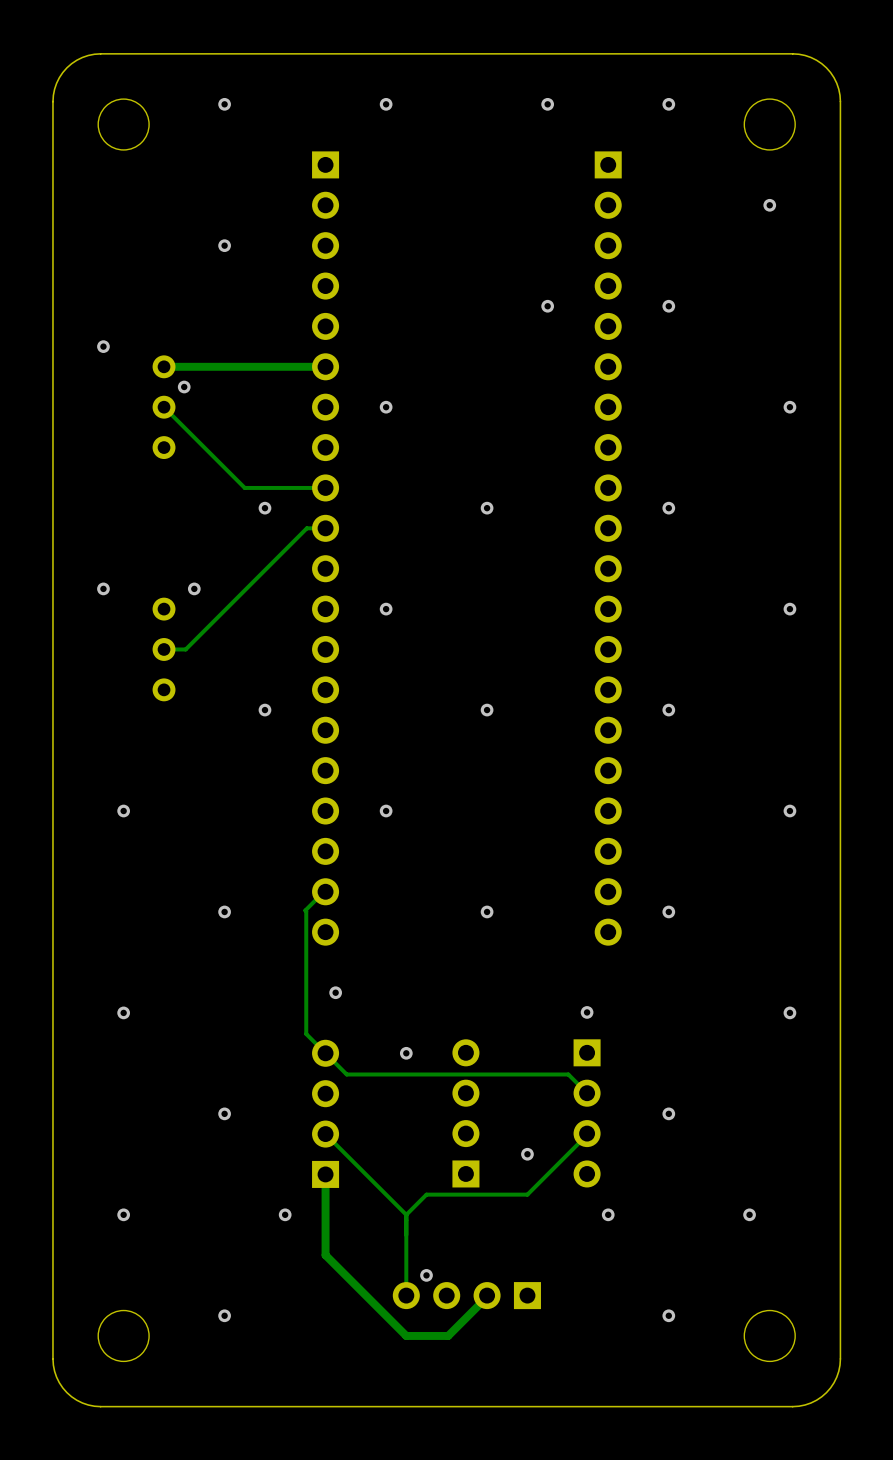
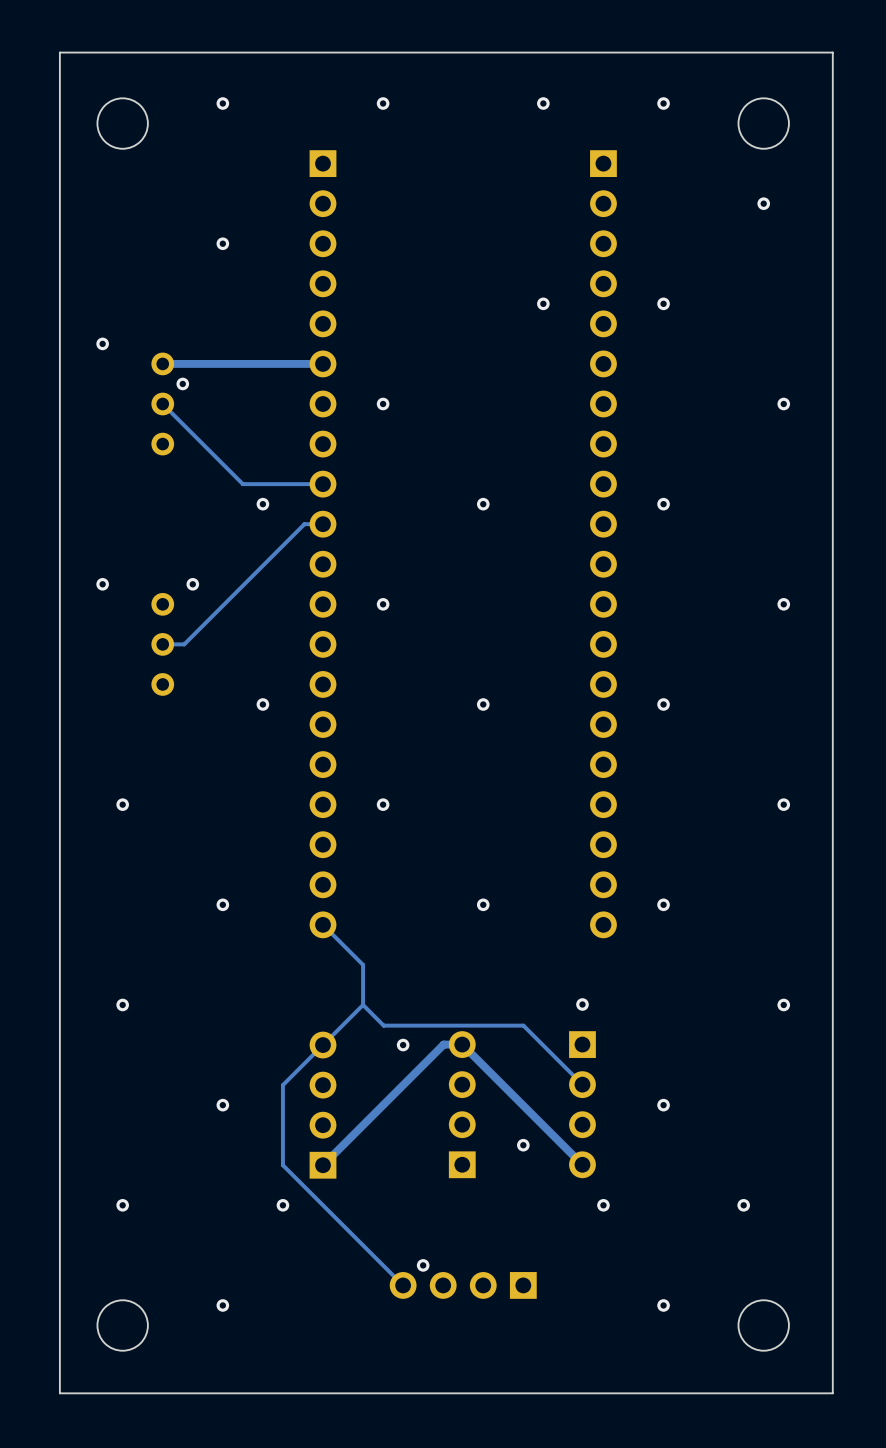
board edge: (792, 53) (100, 53) (88, 55) (76, 60) (66, 67) (59, 77) (54, 89) (52, 101) (52, 1358) (54, 1371) (59, 1382) (66, 1392) (76, 1400) (88, 1405) (100, 1406) (792, 1406) (805, 1405) (816, 1400) (826, 1392) (834, 1382) (838, 1371) (840, 1358) (840, 101) (836, 83) (826, 67) (810, 57) (792, 53) -> (832, 52) (832, 1393) (59, 1393) (59, 52) (832, 52)
track: (325, 891) (305, 910) (306, 1033) (346, 1074) (568, 1074) -> (363, 1004) (383, 1025) (523, 1025) (563, 1066)
track: none -> (323, 924) (363, 964) (363, 1004)
via: (335, 992) -> none
track: (587, 1133) (527, 1194) (426, 1194) (406, 1214) -> none
track: (325, 1134) (406, 1214) -> none
track: (325, 1174) (325, 1255) (406, 1335) (448, 1335) (487, 1295) -> (323, 1165) (443, 1044) (462, 1044) (582, 1164)
track: (406, 1214) (406, 1295) -> (363, 1004) (282, 1085) (282, 1165) (403, 1285)

